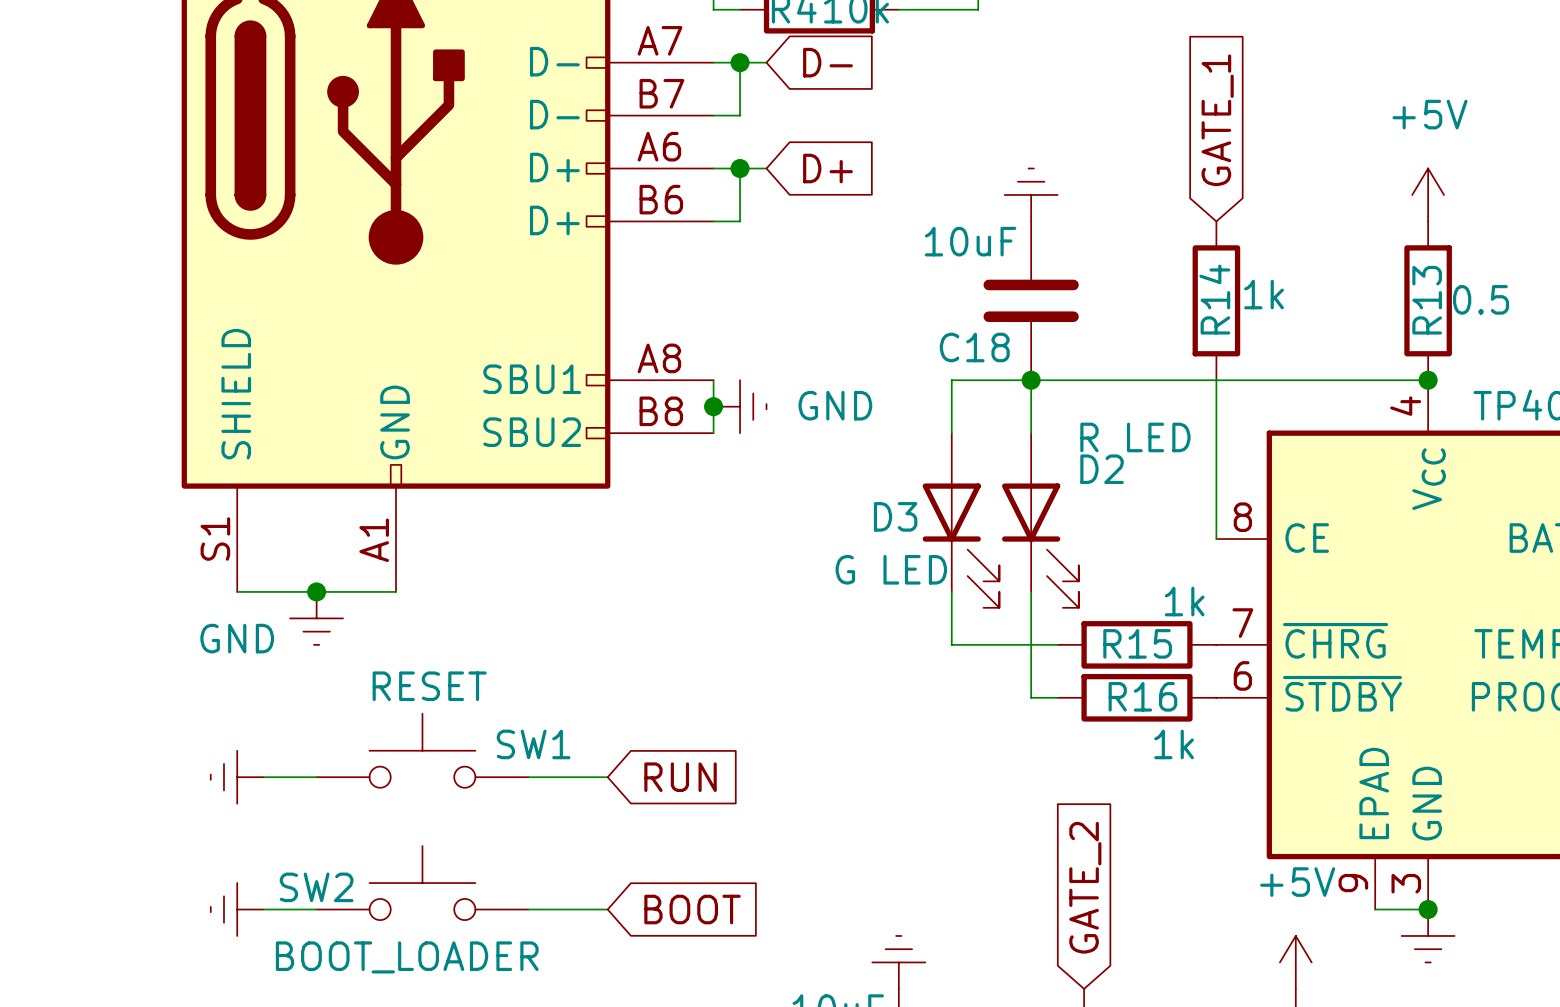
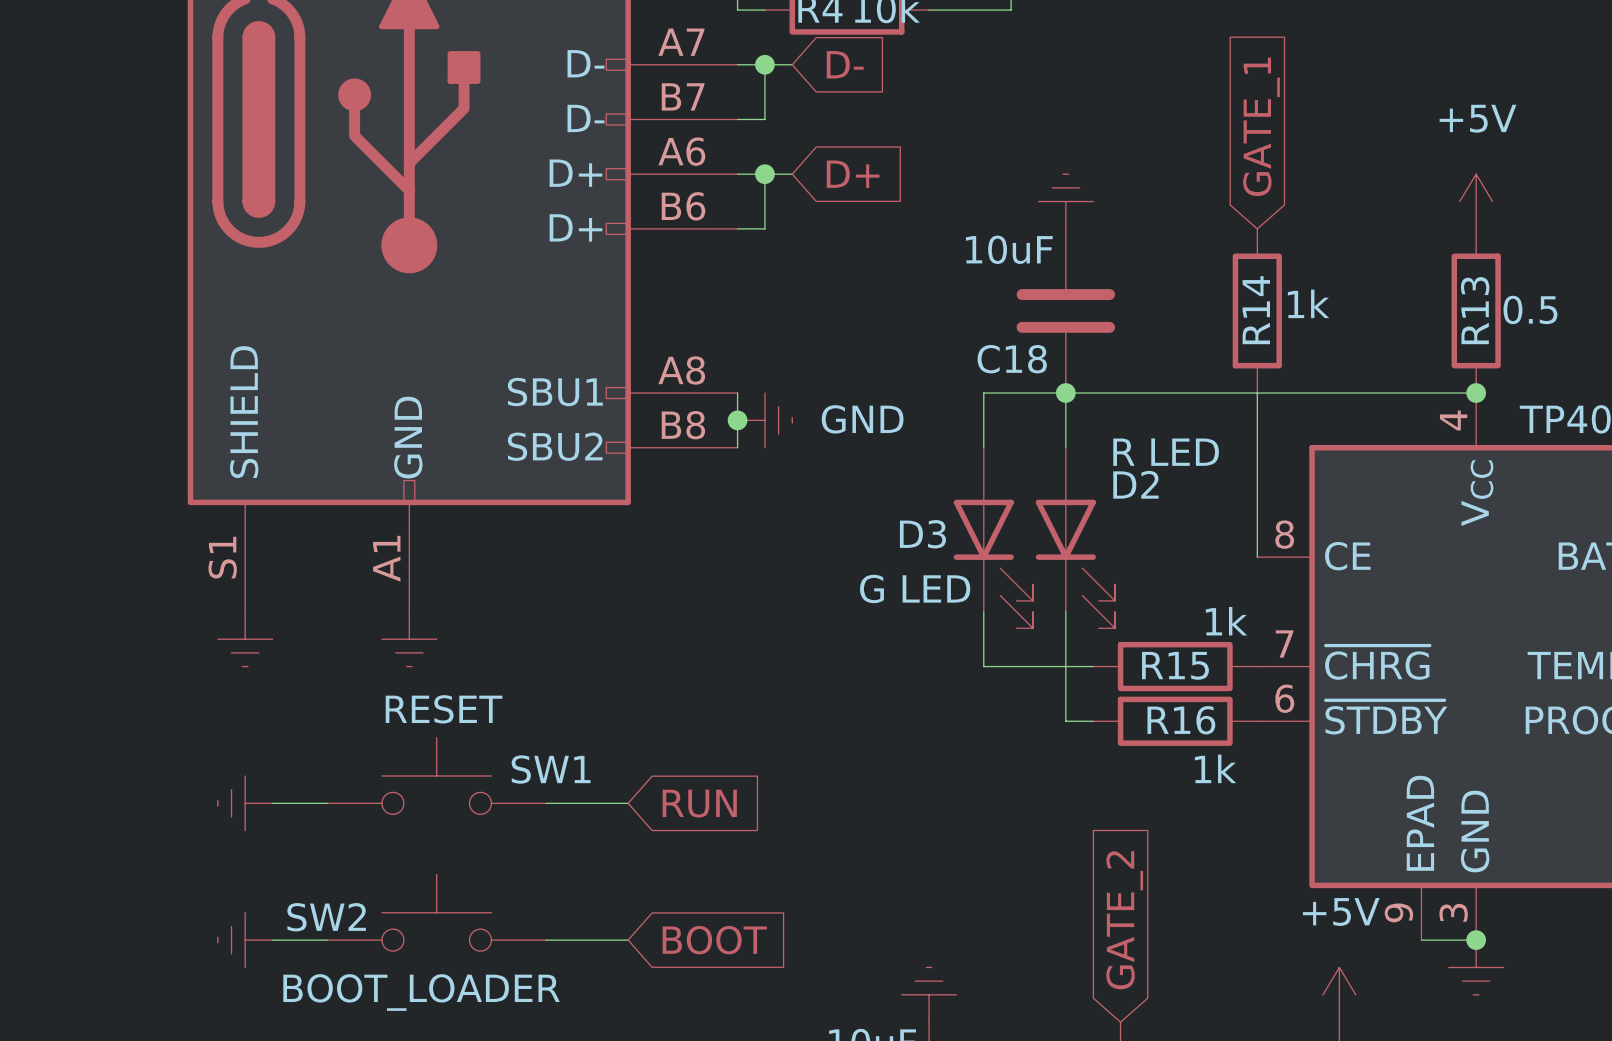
wire: (237, 591) (396, 591) -> none
junction: (316, 591) -> none
power symbol: none -> (245, 639)
power symbol: GND (316, 618) -> none
power symbol: none -> (409, 639)

